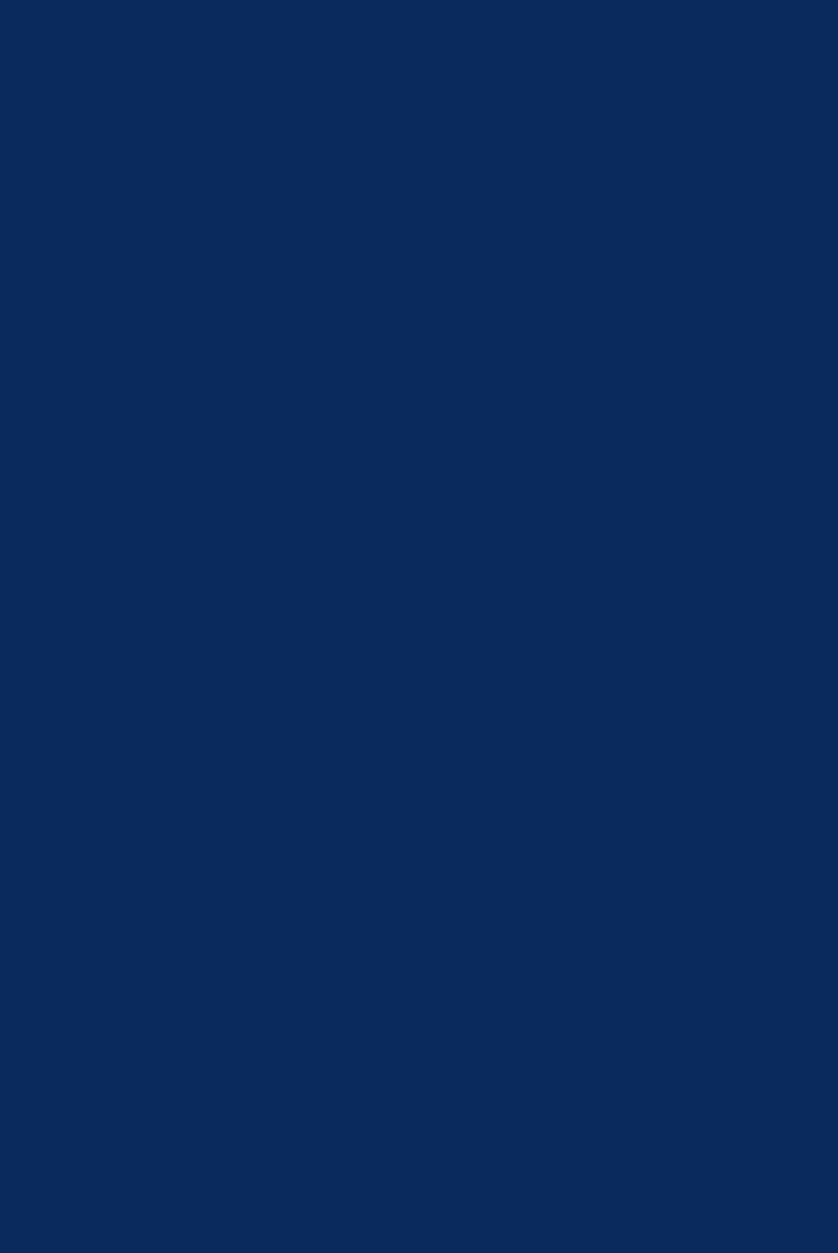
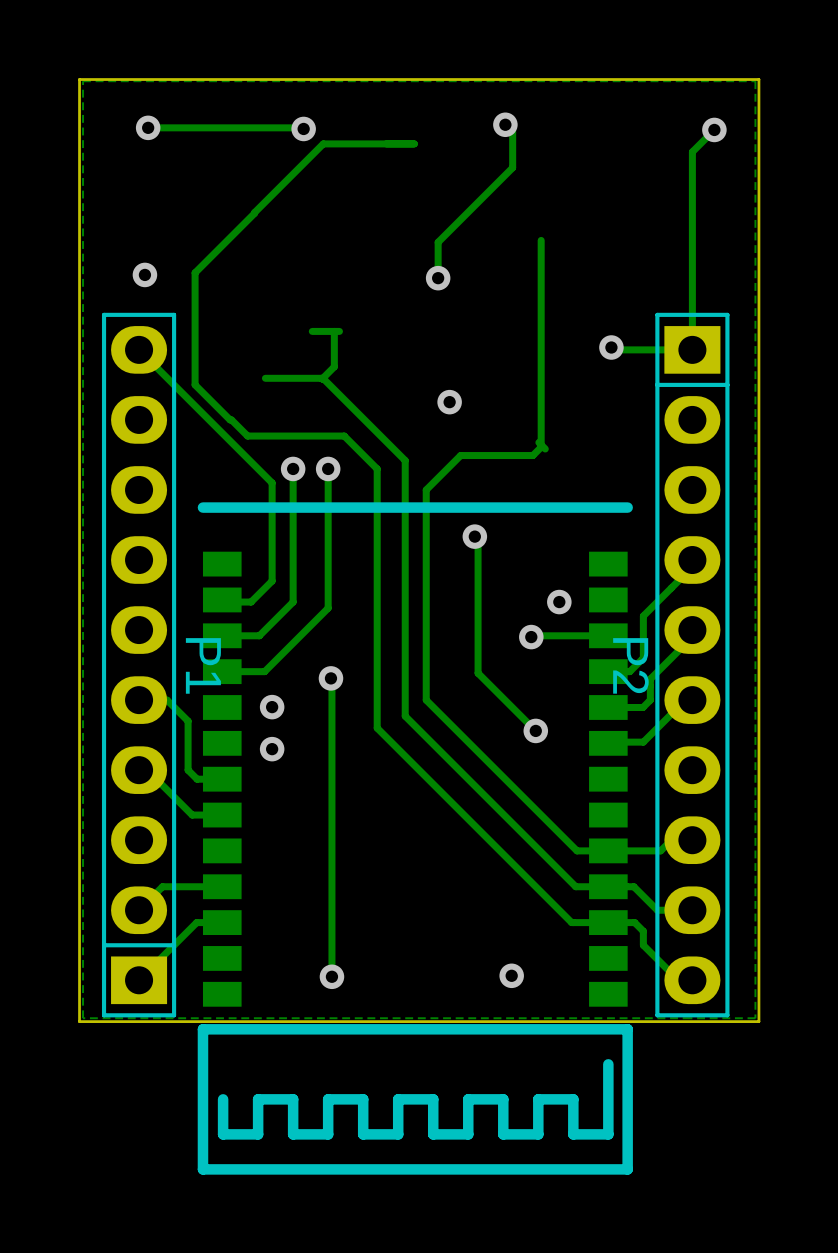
board edge: none -> (758, 79) (758, 1021) (79, 1021) (79, 79) (758, 79)
zone outline: none -> (755, 81) (83, 81) (83, 1018) (755, 1018) (755, 81)
track: none -> (505, 124) (512, 132) (512, 167) (438, 242) (438, 278)
via: none -> (505, 124)
track: none -> (148, 127) (303, 128)
via: none -> (148, 127)
via: none -> (303, 128)
track: none -> (714, 129) (692, 151) (692, 349) (613, 349) (611, 347)
via: none -> (714, 129)
track: none -> (414, 143) (323, 143) (195, 272) (195, 384) (247, 436) (344, 436) (377, 468) (377, 728) (571, 922) (634, 922) (643, 931) (643, 945) (678, 980) (699, 980)
track: none -> (541, 240) (541, 447) (532, 455) (460, 455) (426, 489) (426, 700) (577, 850) (660, 850) (671, 840) (699, 840)
via: none -> (144, 274)
via: none -> (438, 278)
track: none -> (334, 331) (334, 366) (322, 378)
track: none -> (339, 331) (312, 331)
via: none -> (611, 347)
track: none -> (139, 349) (272, 482) (272, 581) (251, 602) (224, 602) (222, 599)
track: none -> (265, 378) (322, 378)
track: none -> (322, 378) (405, 460) (405, 716) (575, 886) (633, 886) (657, 910) (699, 910)
via: none -> (449, 402)
track: none -> (538, 442) (545, 449)
track: none -> (293, 468) (293, 602) (259, 635) (222, 635)
via: none -> (293, 468)
track: none -> (328, 468) (328, 608) (264, 671) (222, 671)
via: none -> (328, 468)
track: none -> (474, 536) (478, 539) (478, 673) (535, 730)
via: none -> (474, 536)
track: none -> (699, 560) (643, 616) (643, 658) (629, 671) (608, 672)
via: none -> (559, 602)
track: none -> (685, 630) (699, 630) (650, 679) (650, 700) (642, 707) (608, 707)
track: none -> (608, 635) (531, 637)
via: none -> (531, 637)
P1: none -> (139, 665)
P2: none -> (692, 665)
track: none -> (330, 678) (331, 976)
via: none -> (330, 678)
track: none -> (139, 700) (167, 700) (188, 721) (188, 770) (197, 779) (222, 779)
track: none -> (699, 700) (685, 700) (643, 742) (608, 743)
via: none -> (272, 707)
via: none -> (535, 730)
via: none -> (272, 749)
track: none -> (139, 770) (147, 770) (192, 815) (222, 815)
part: none -> (415, 838)
track: none -> (222, 886) (162, 886) (139, 910)
track: none -> (222, 922) (196, 922) (139, 980)
via: none -> (511, 975)
via: none -> (331, 976)

